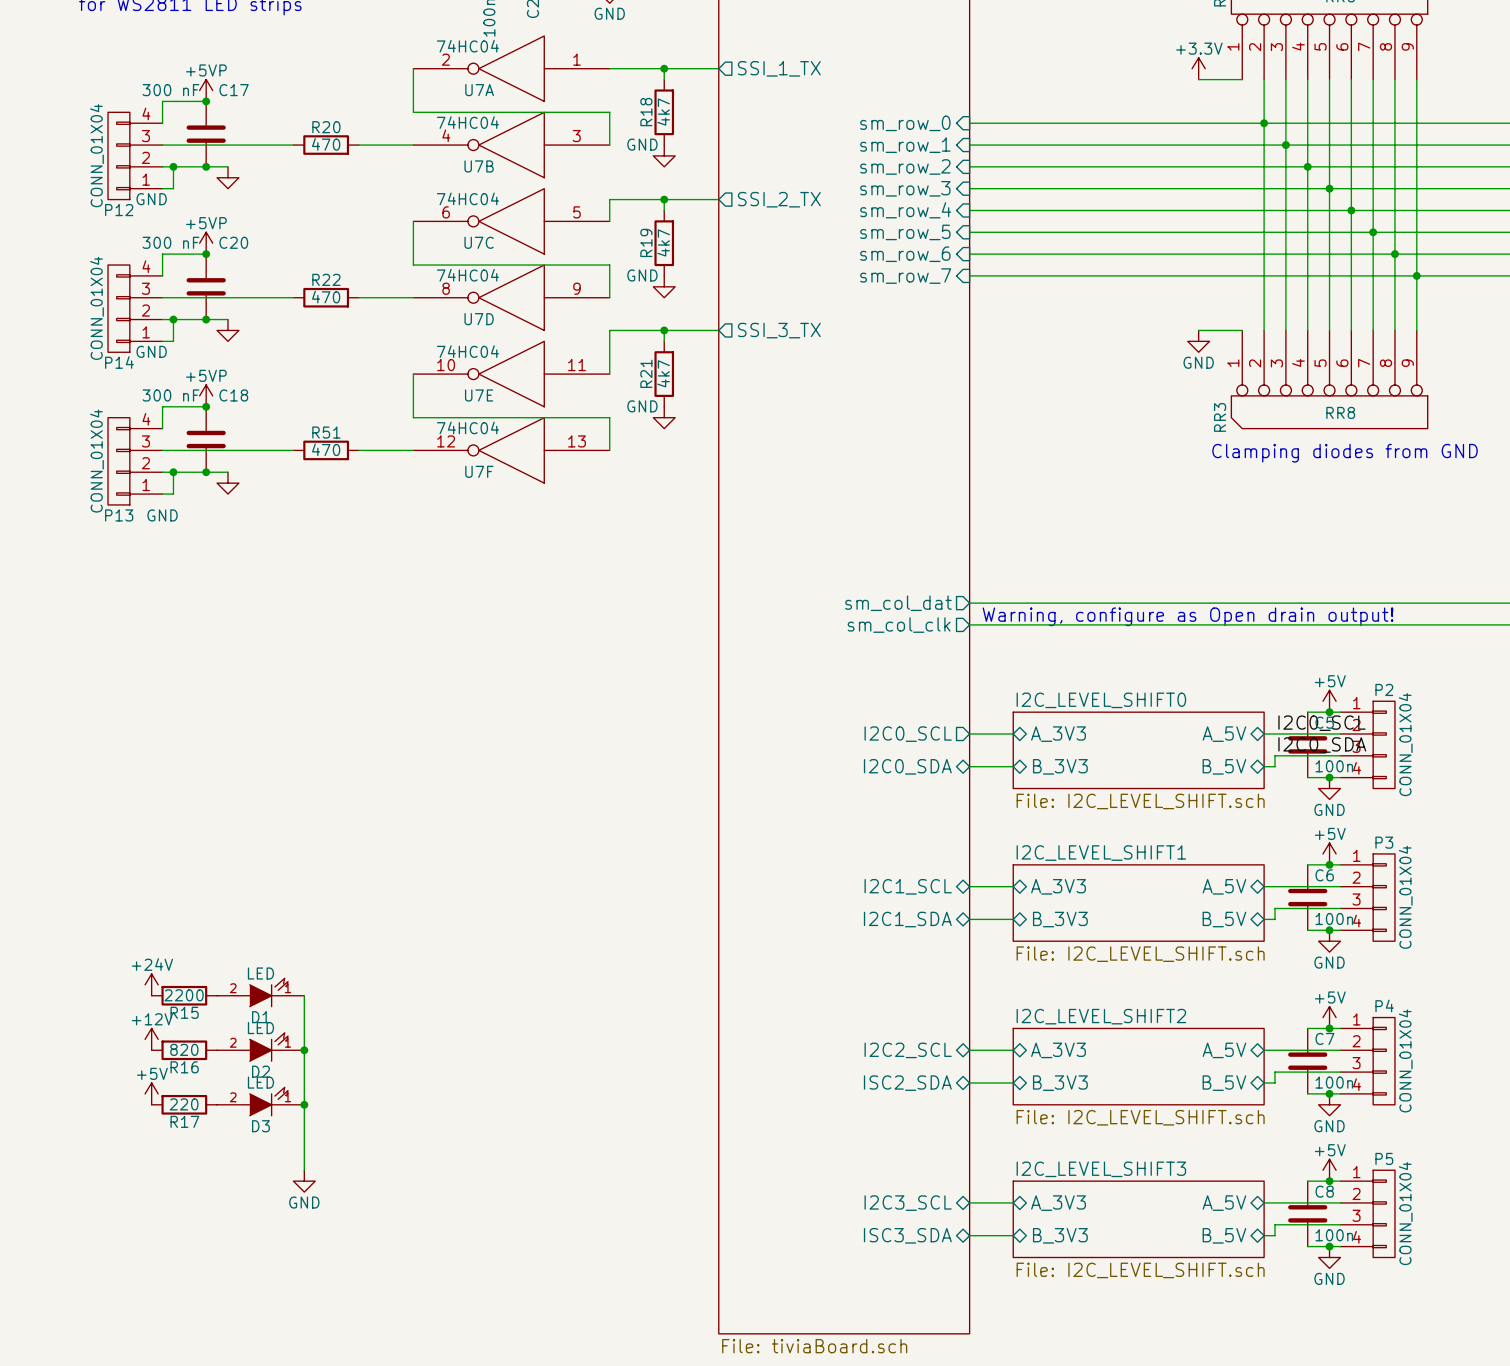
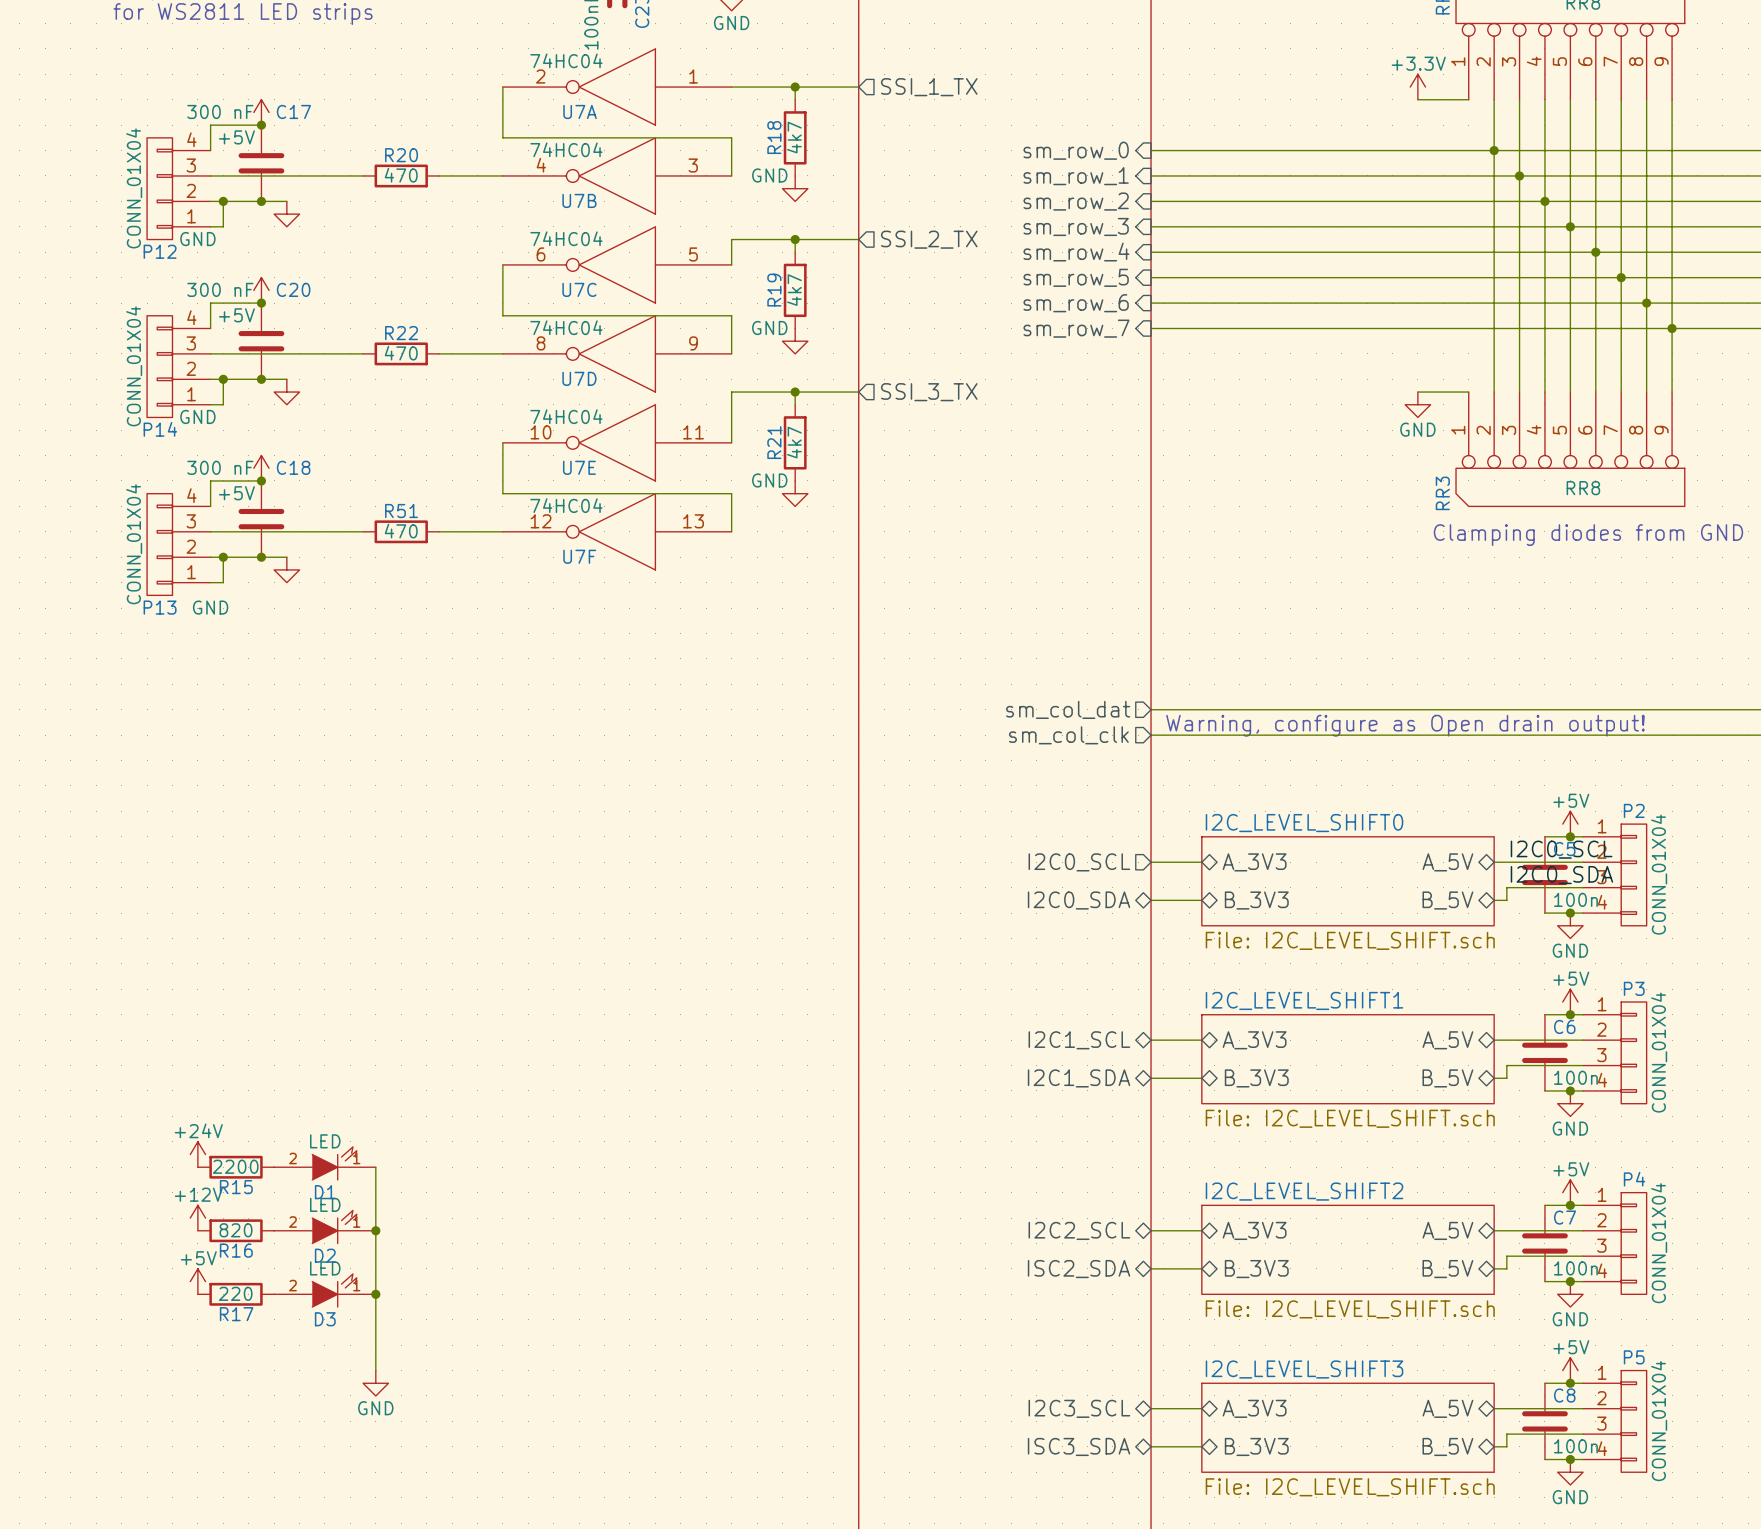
power symbol: +5VP (206, 90) -> +5V (261, 112)
power symbol: +5VP (206, 243) -> +5V (261, 290)
power symbol: +5VP (206, 395) -> +5V (261, 468)

